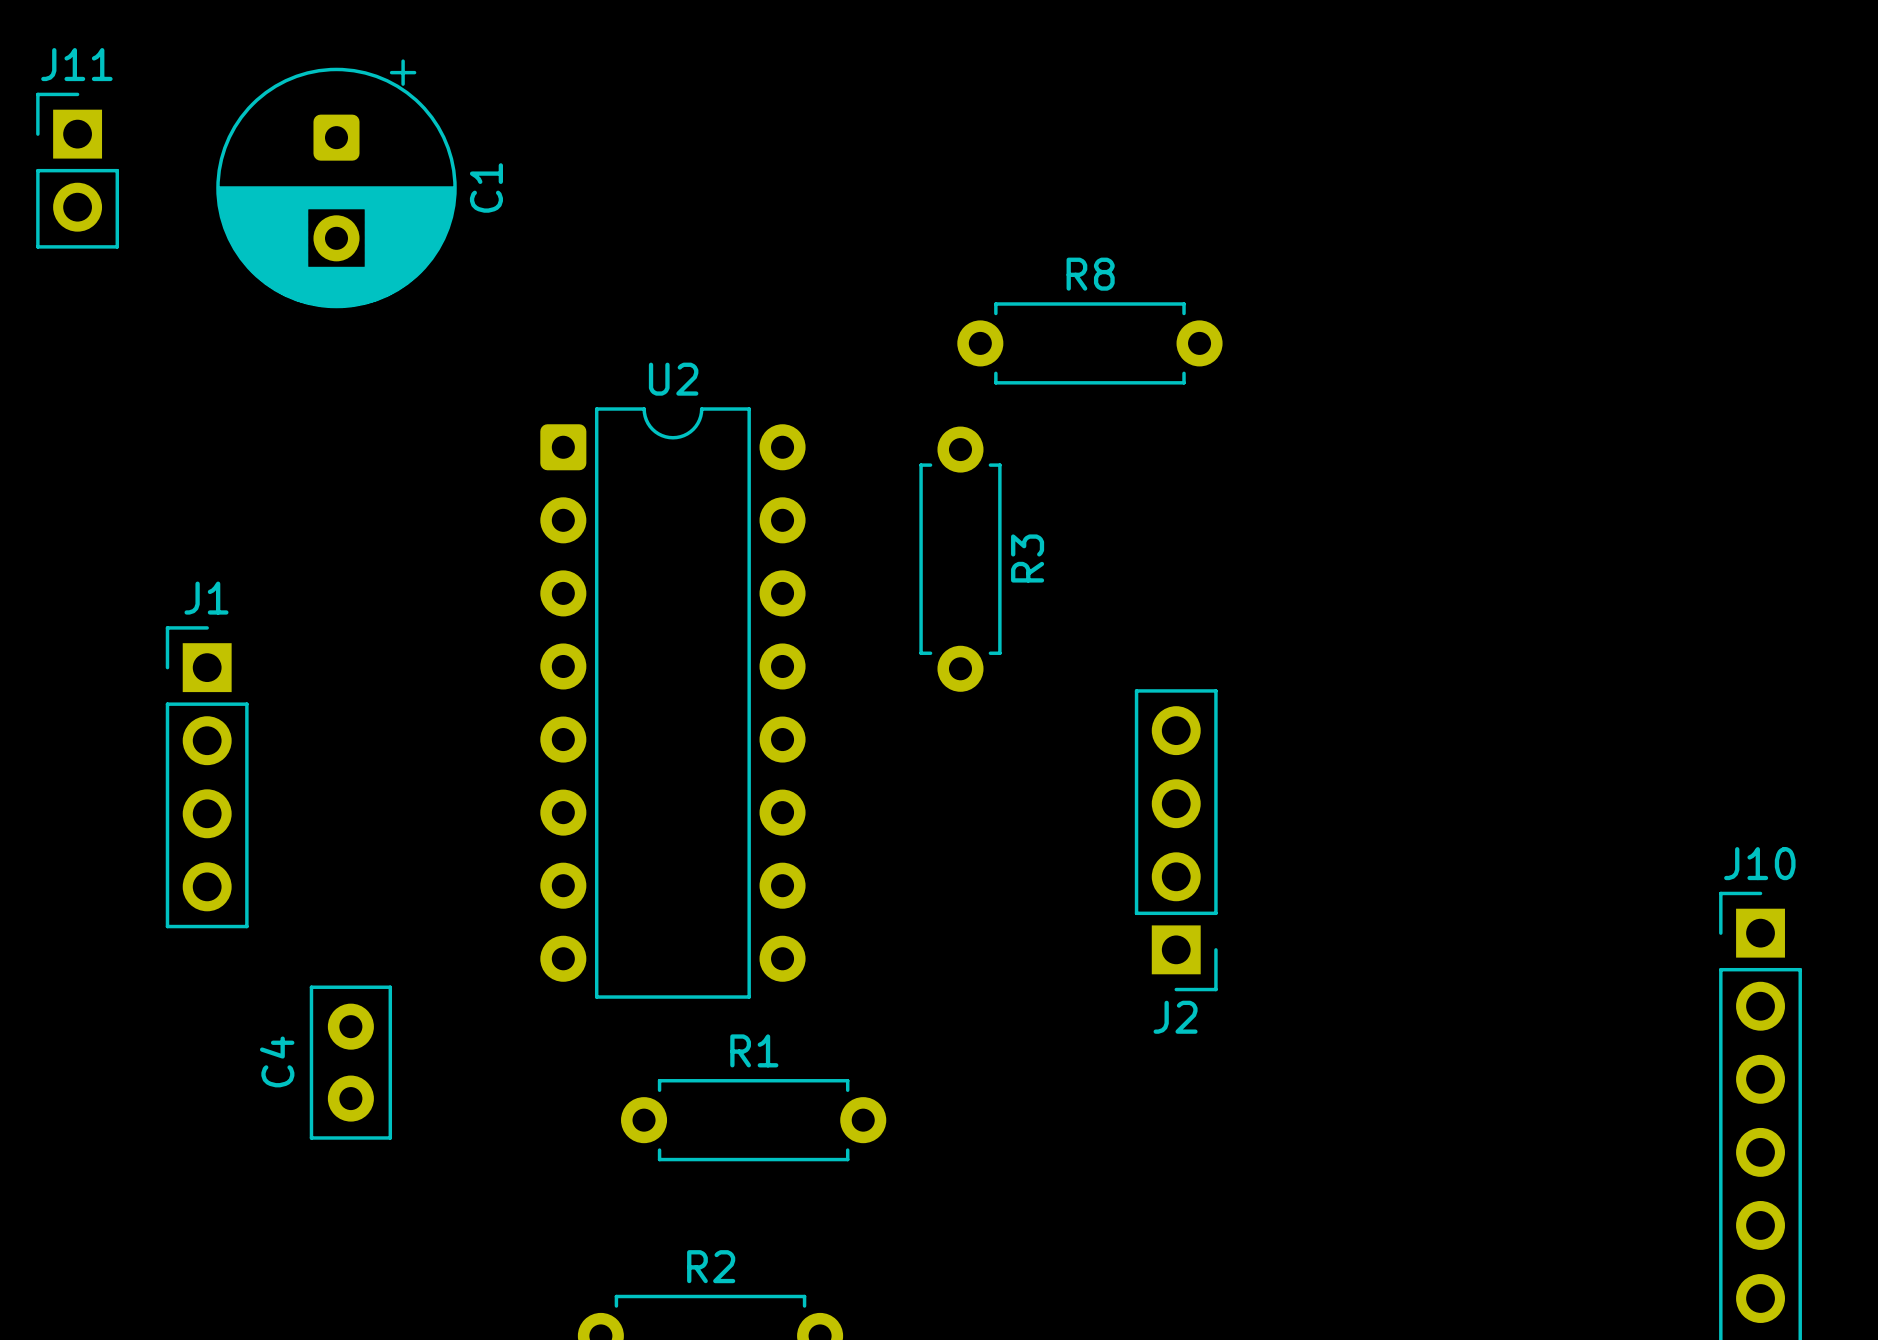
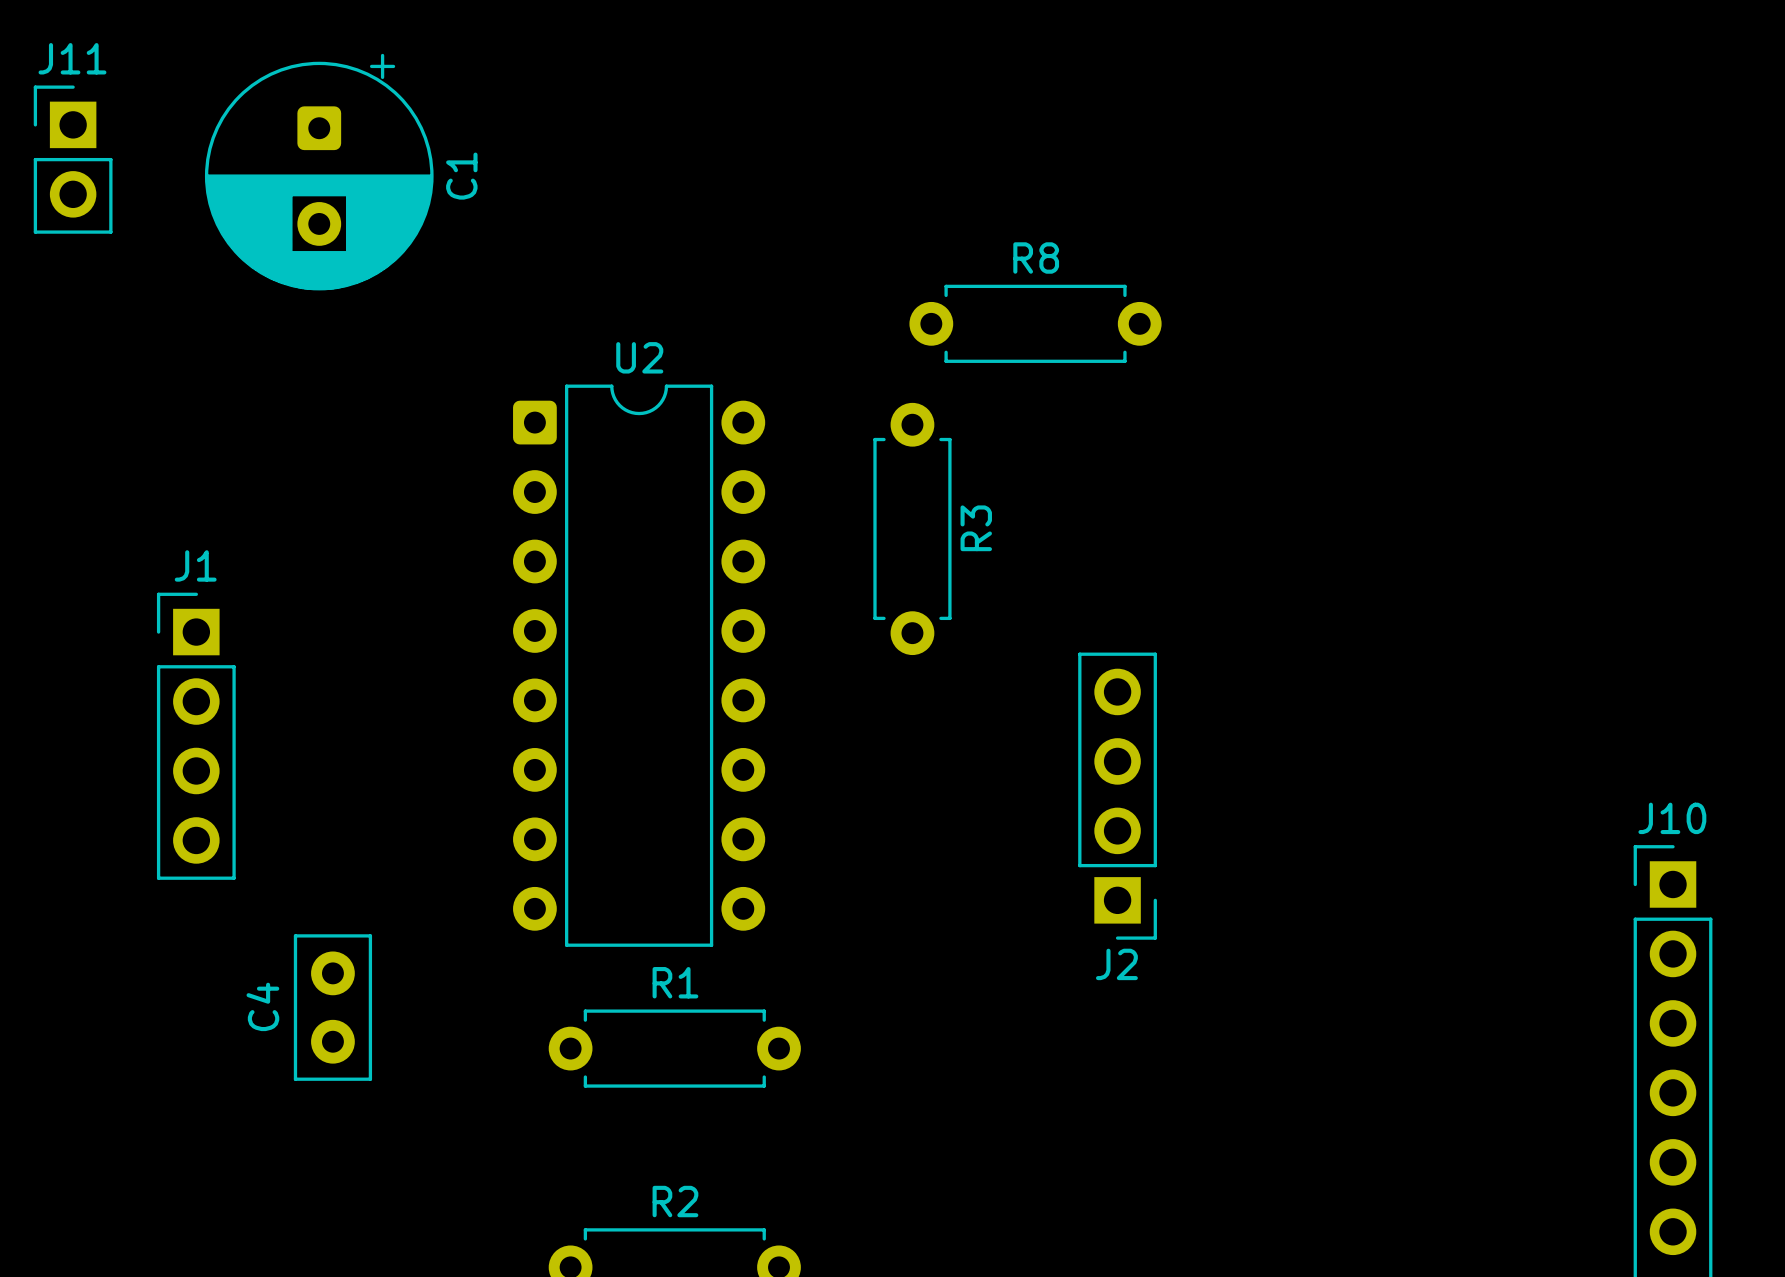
R1 position: (753, 1120) -> (674, 1048)

